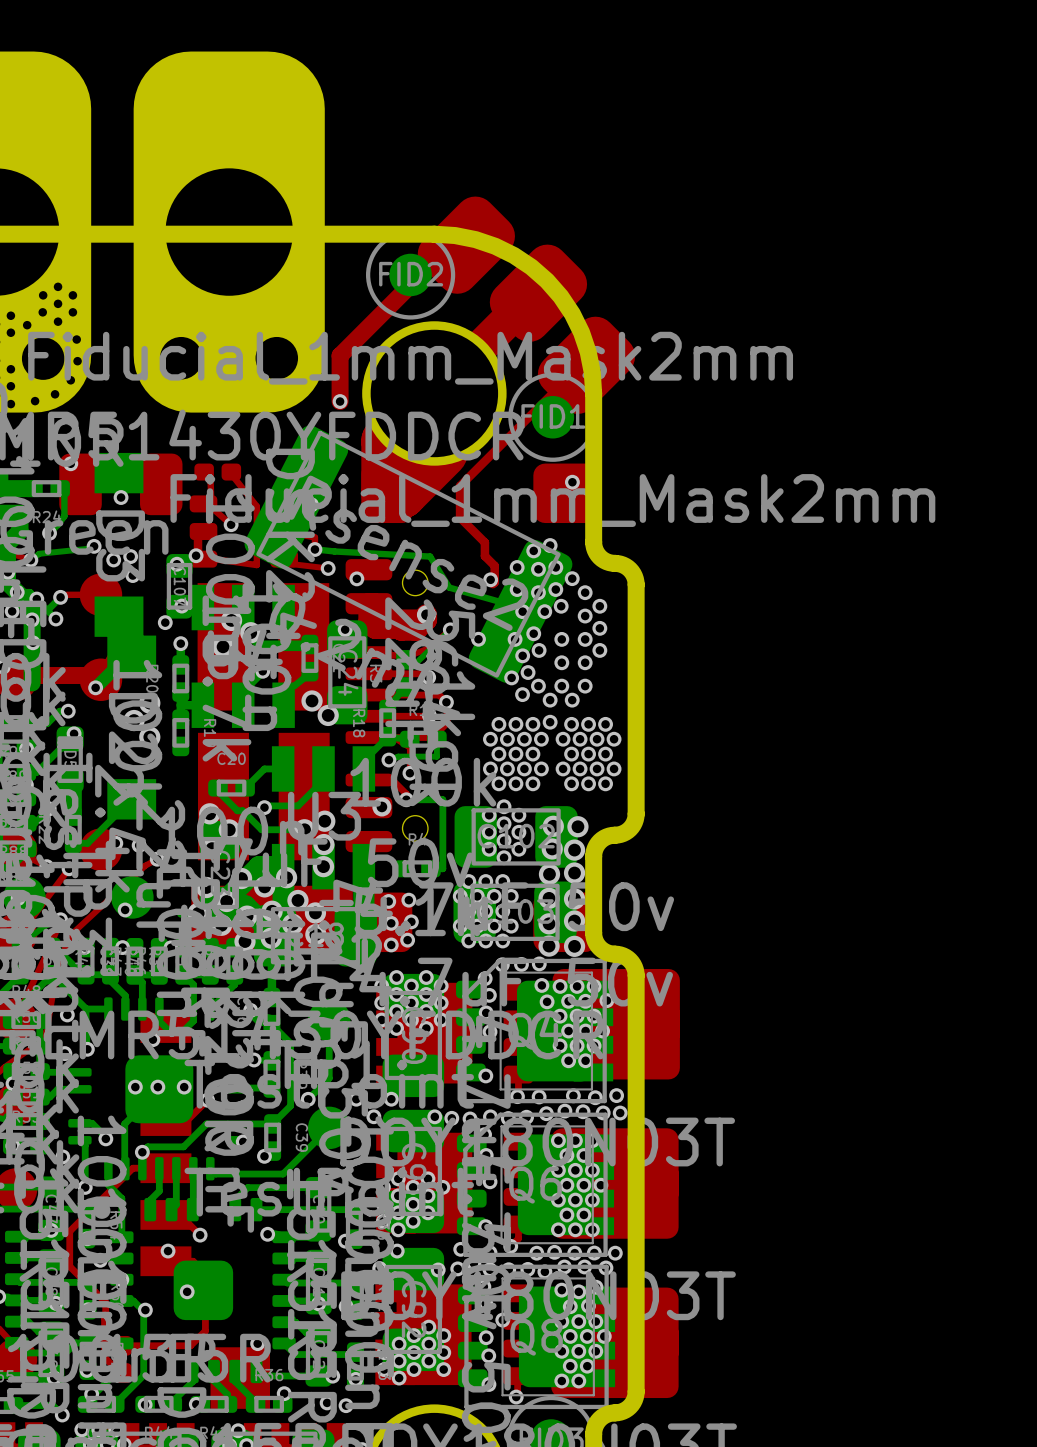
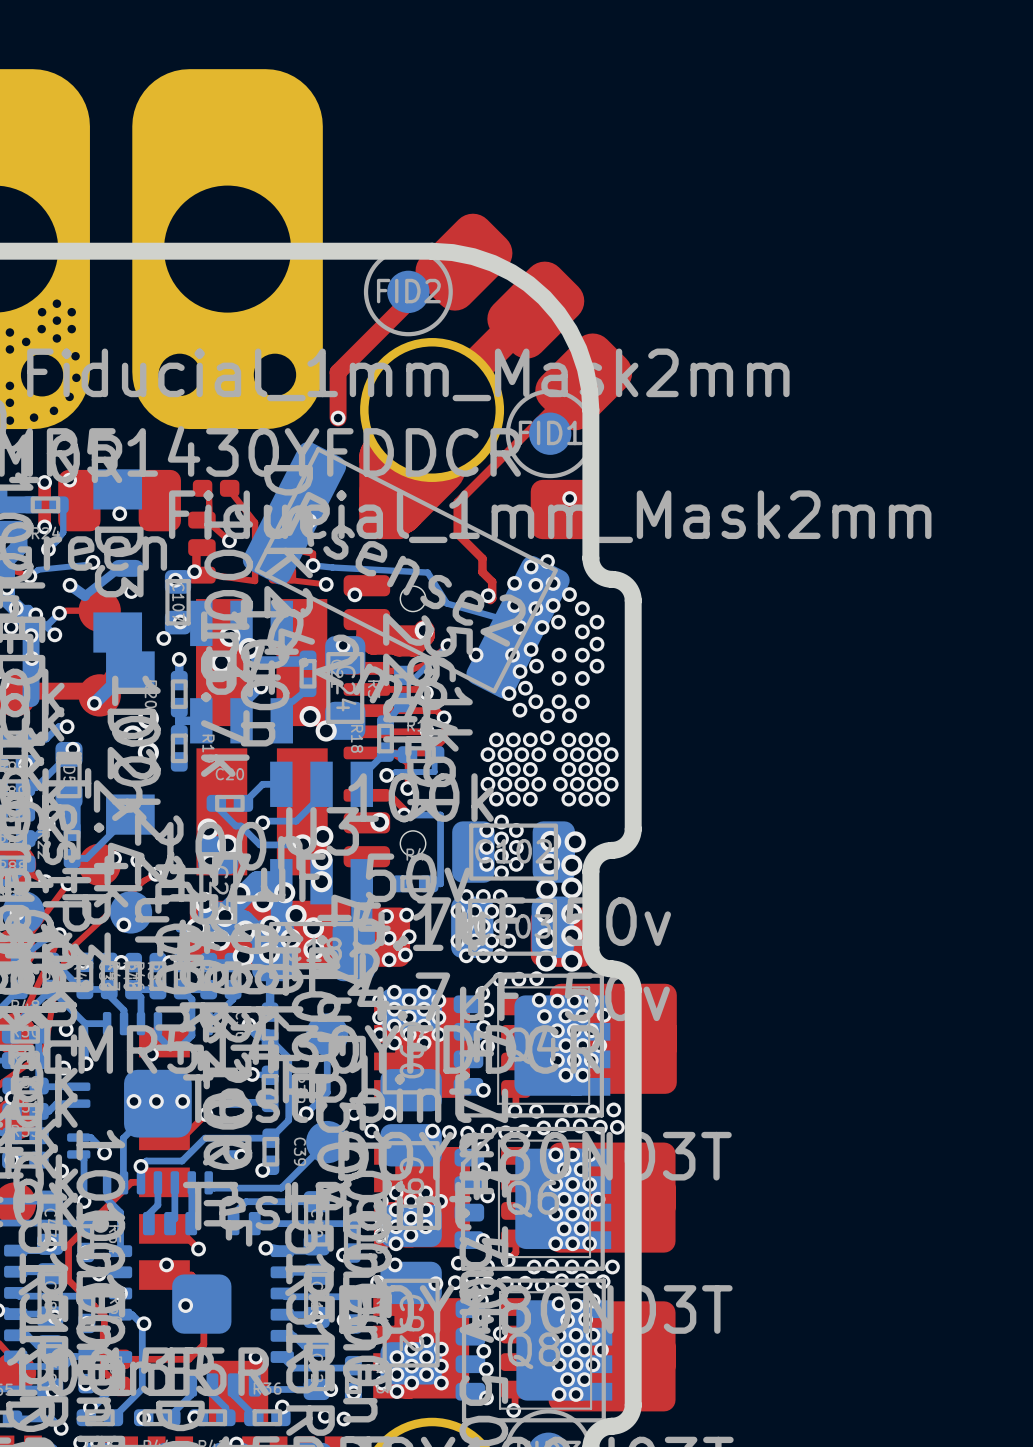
top track: none -> (44, 482) (44, 525)
via: none -> (44, 482)
via: none -> (44, 526)
bottom track: none -> (135, 568) (118, 568)
bottom track: none -> (116, 570) (85, 594)
via: (130, 556) -> none
via: (113, 559) -> none
bottom track: none -> (70, 585) (84, 595)
via: none -> (70, 585)

